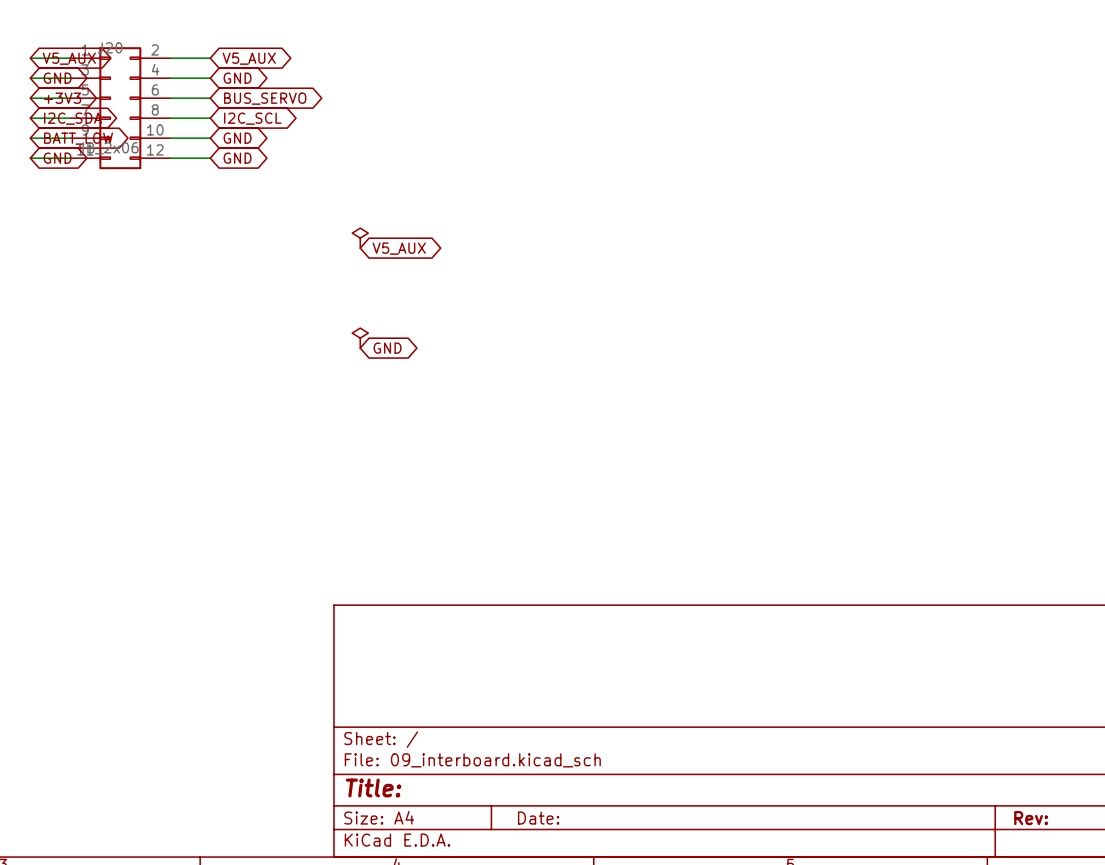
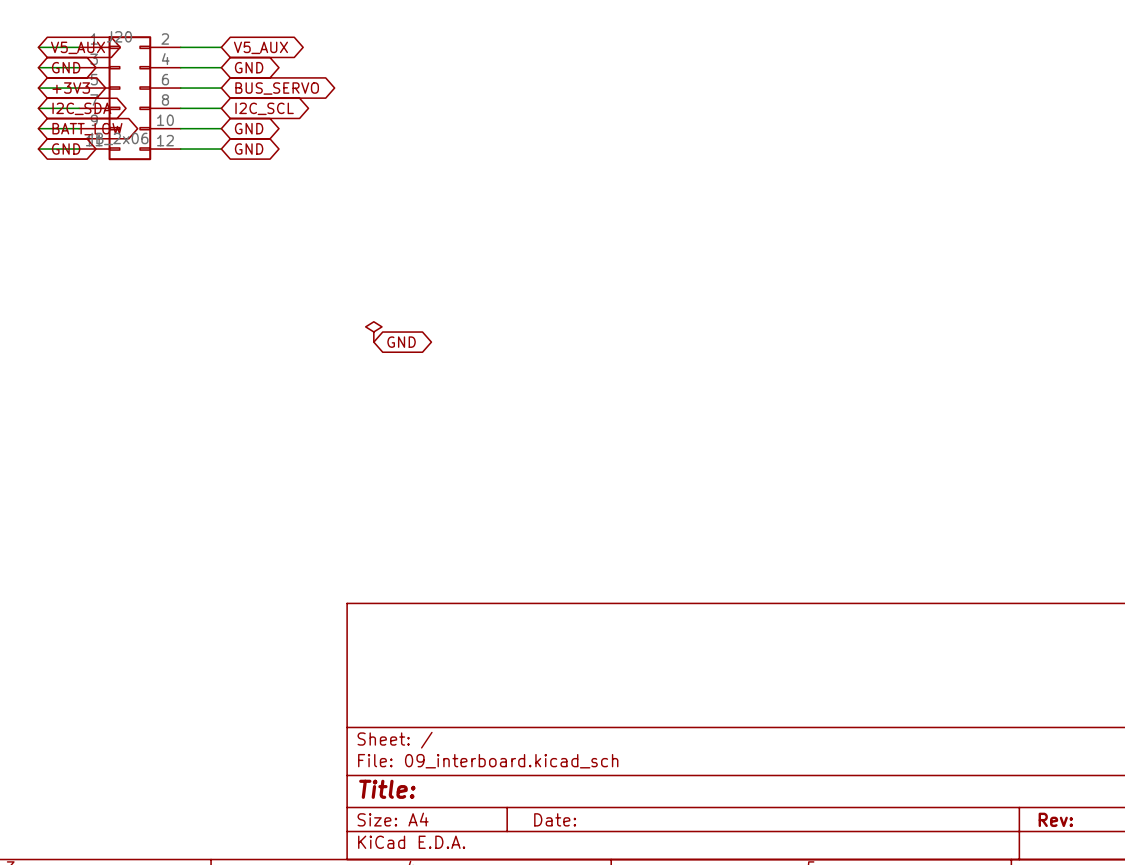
power symbol: (360, 238) -> none
global label: V5_AUX (399, 248) -> none

